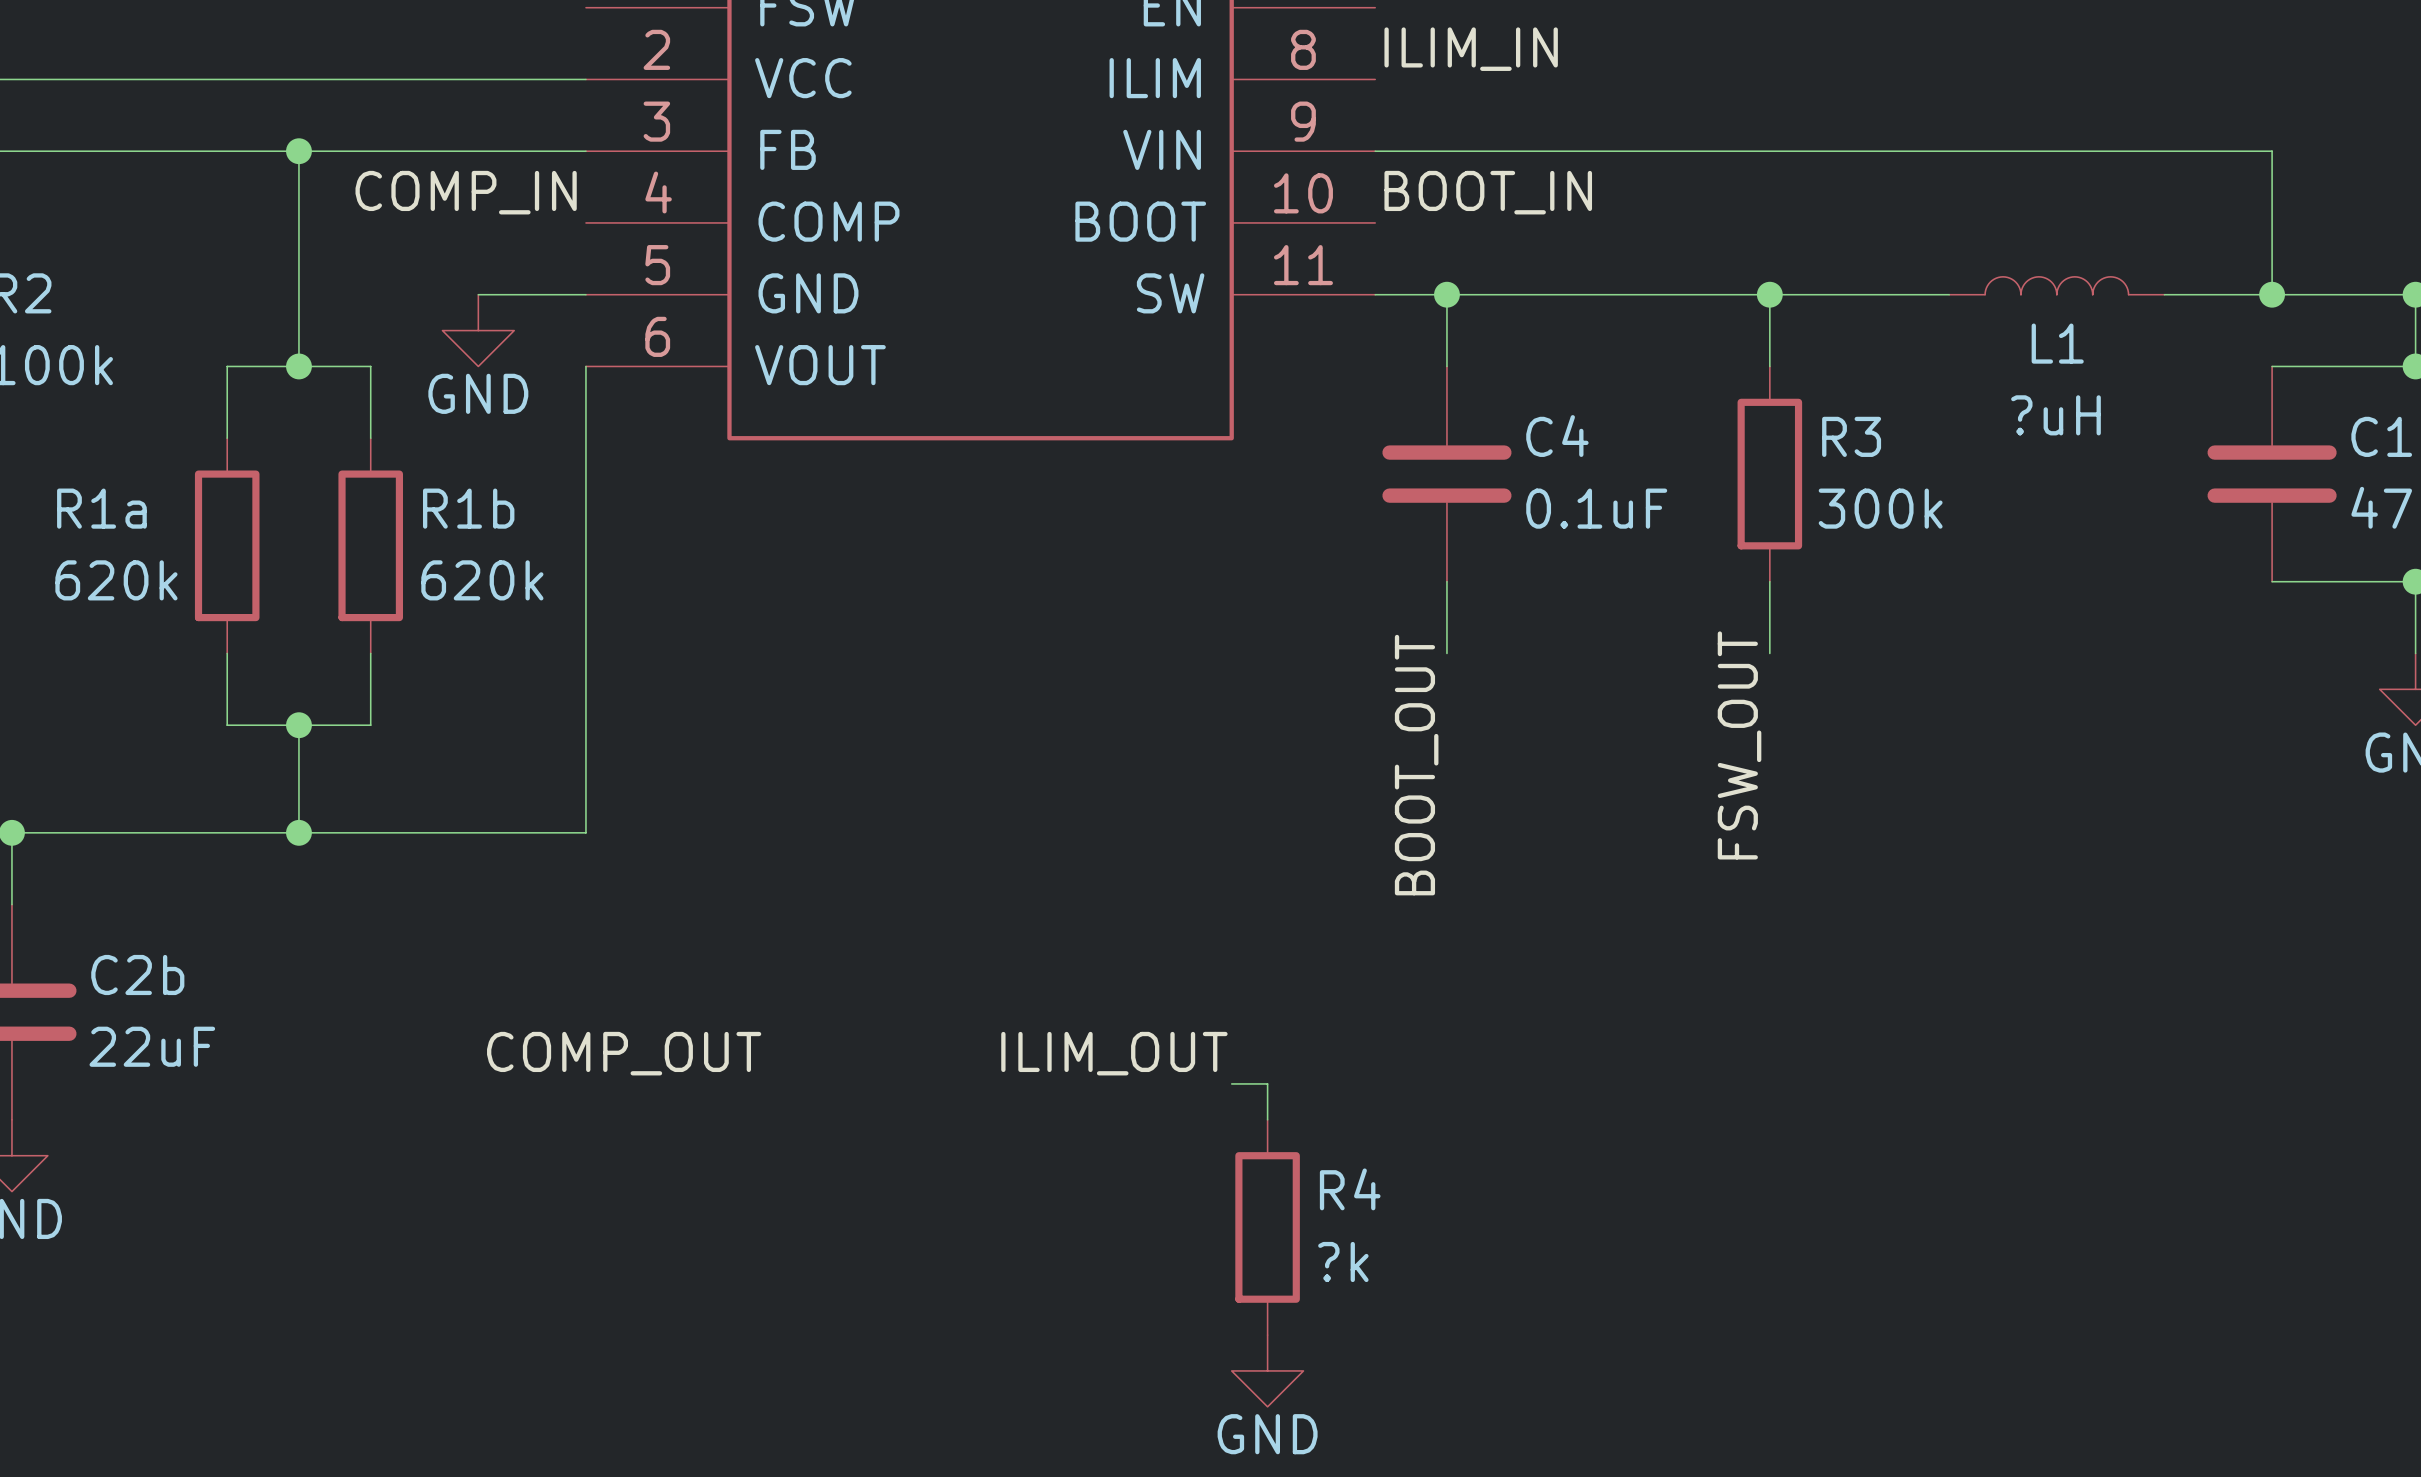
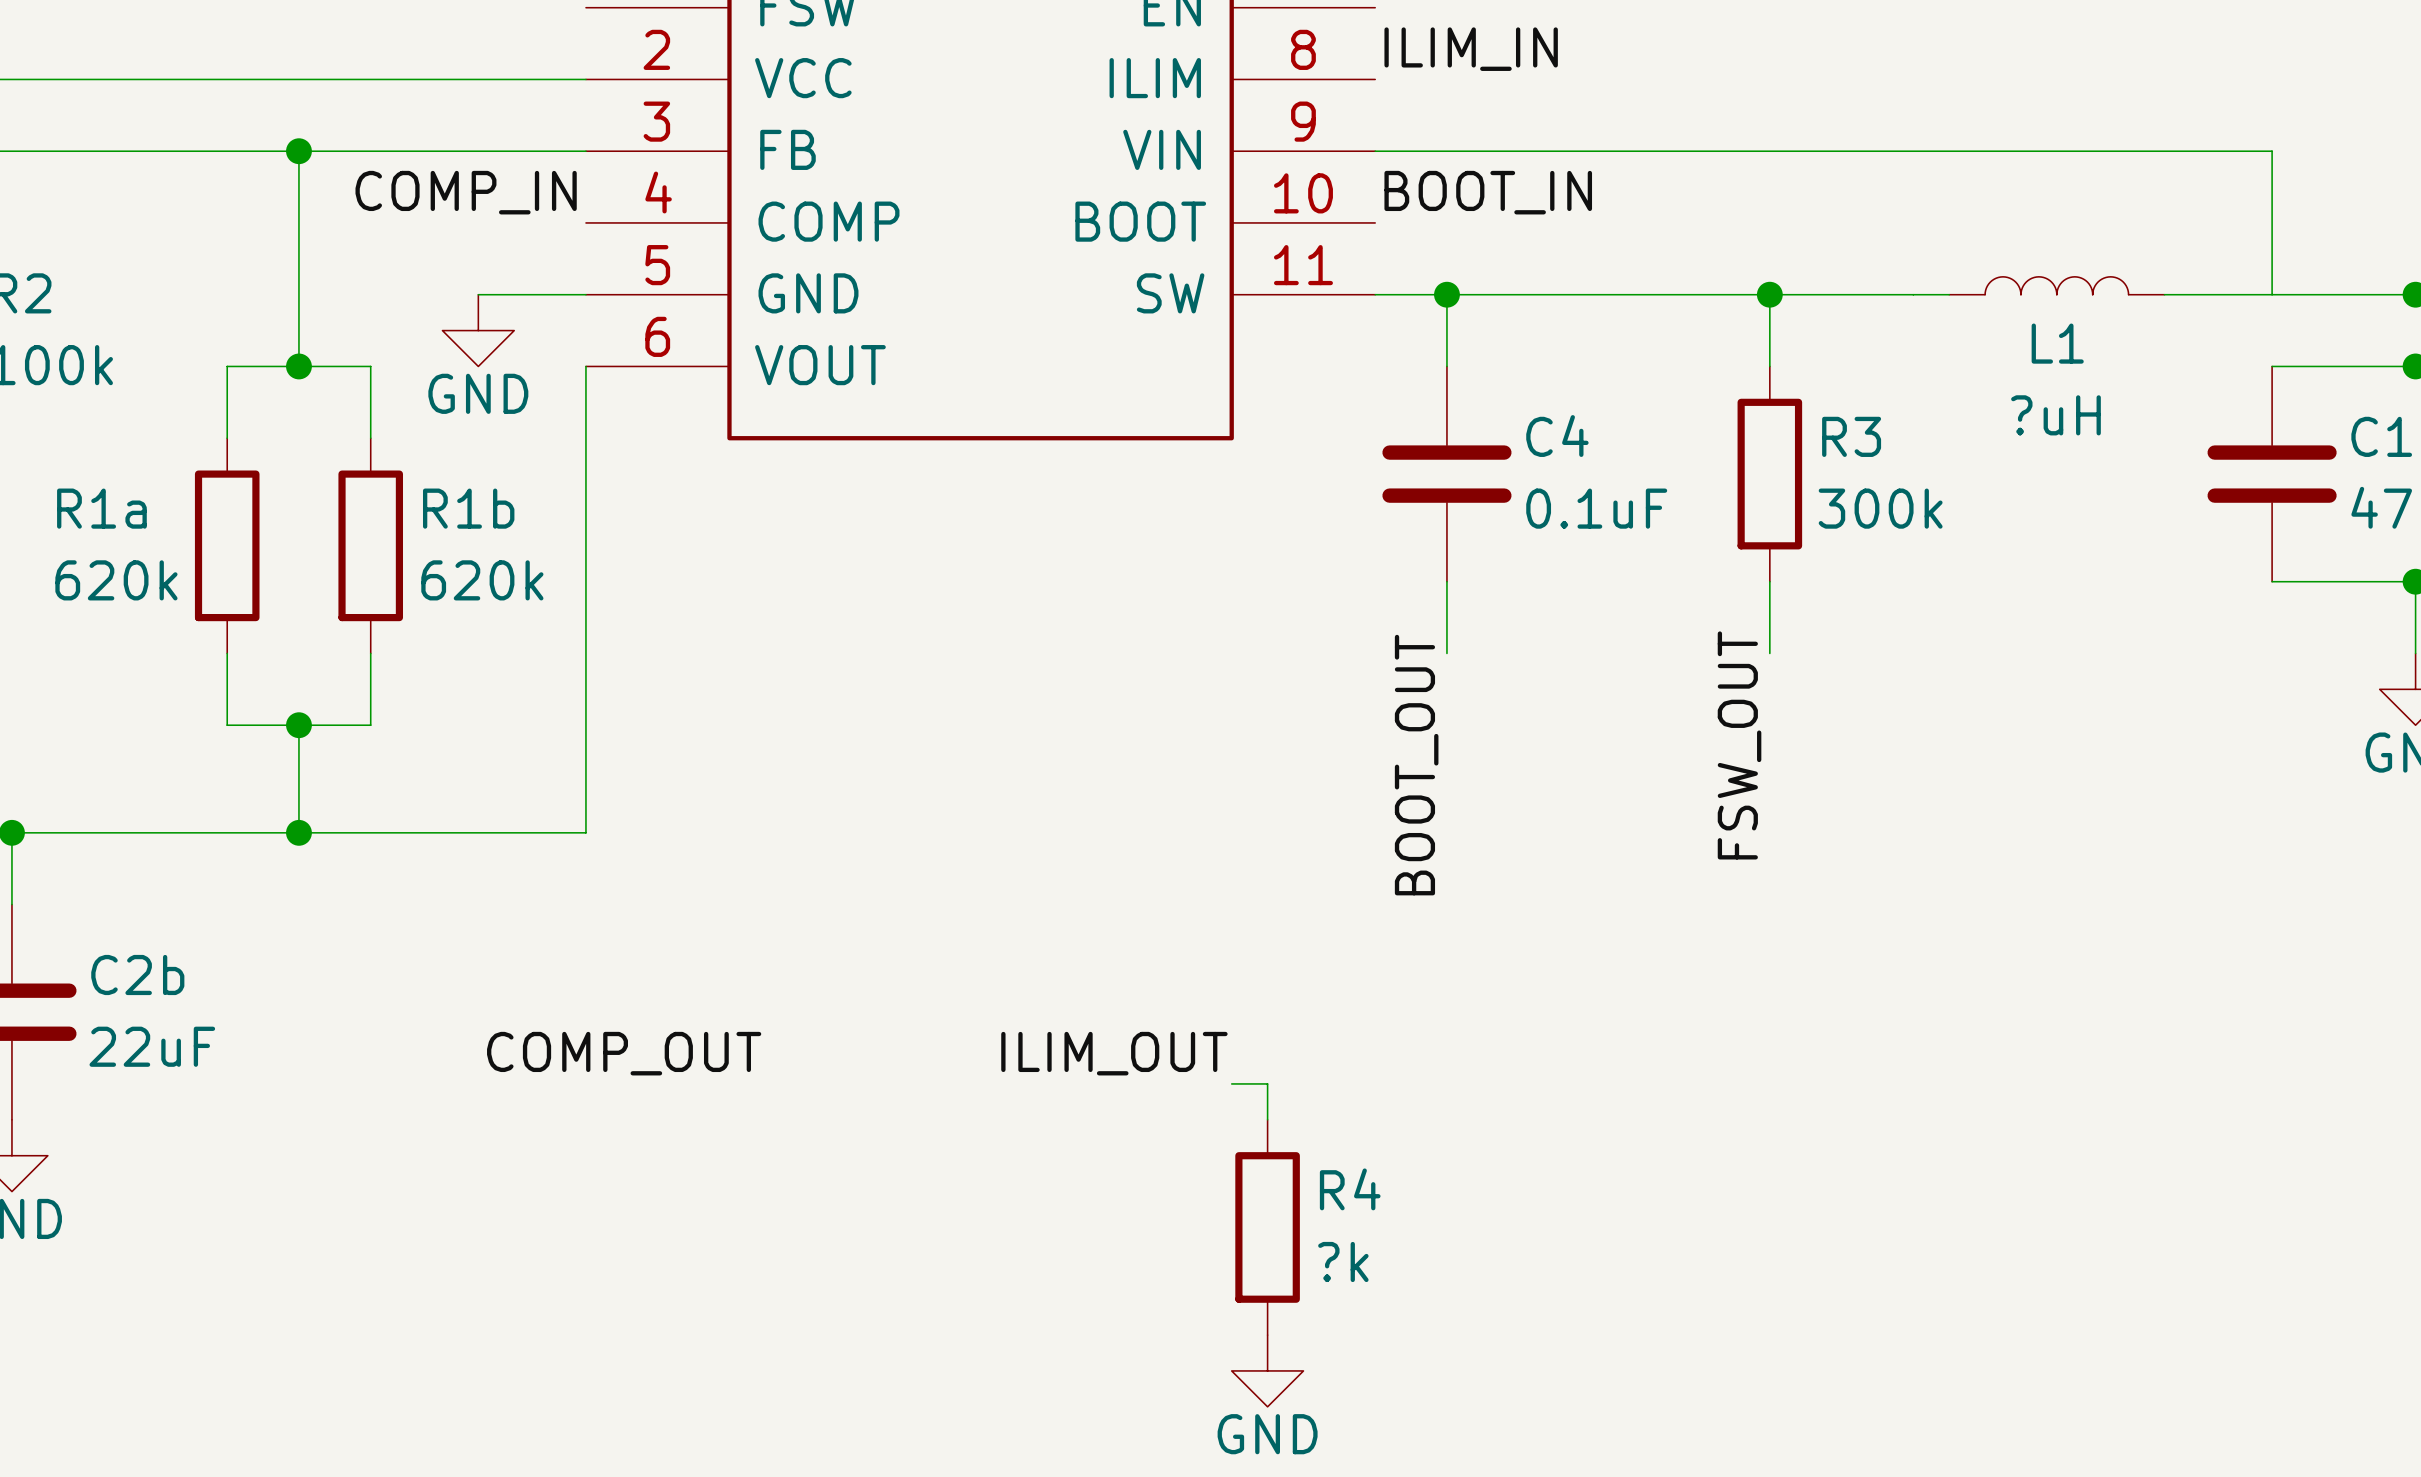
junction: (2272, 294) -> none
wire: (2415, 294) (2415, 366) -> none

